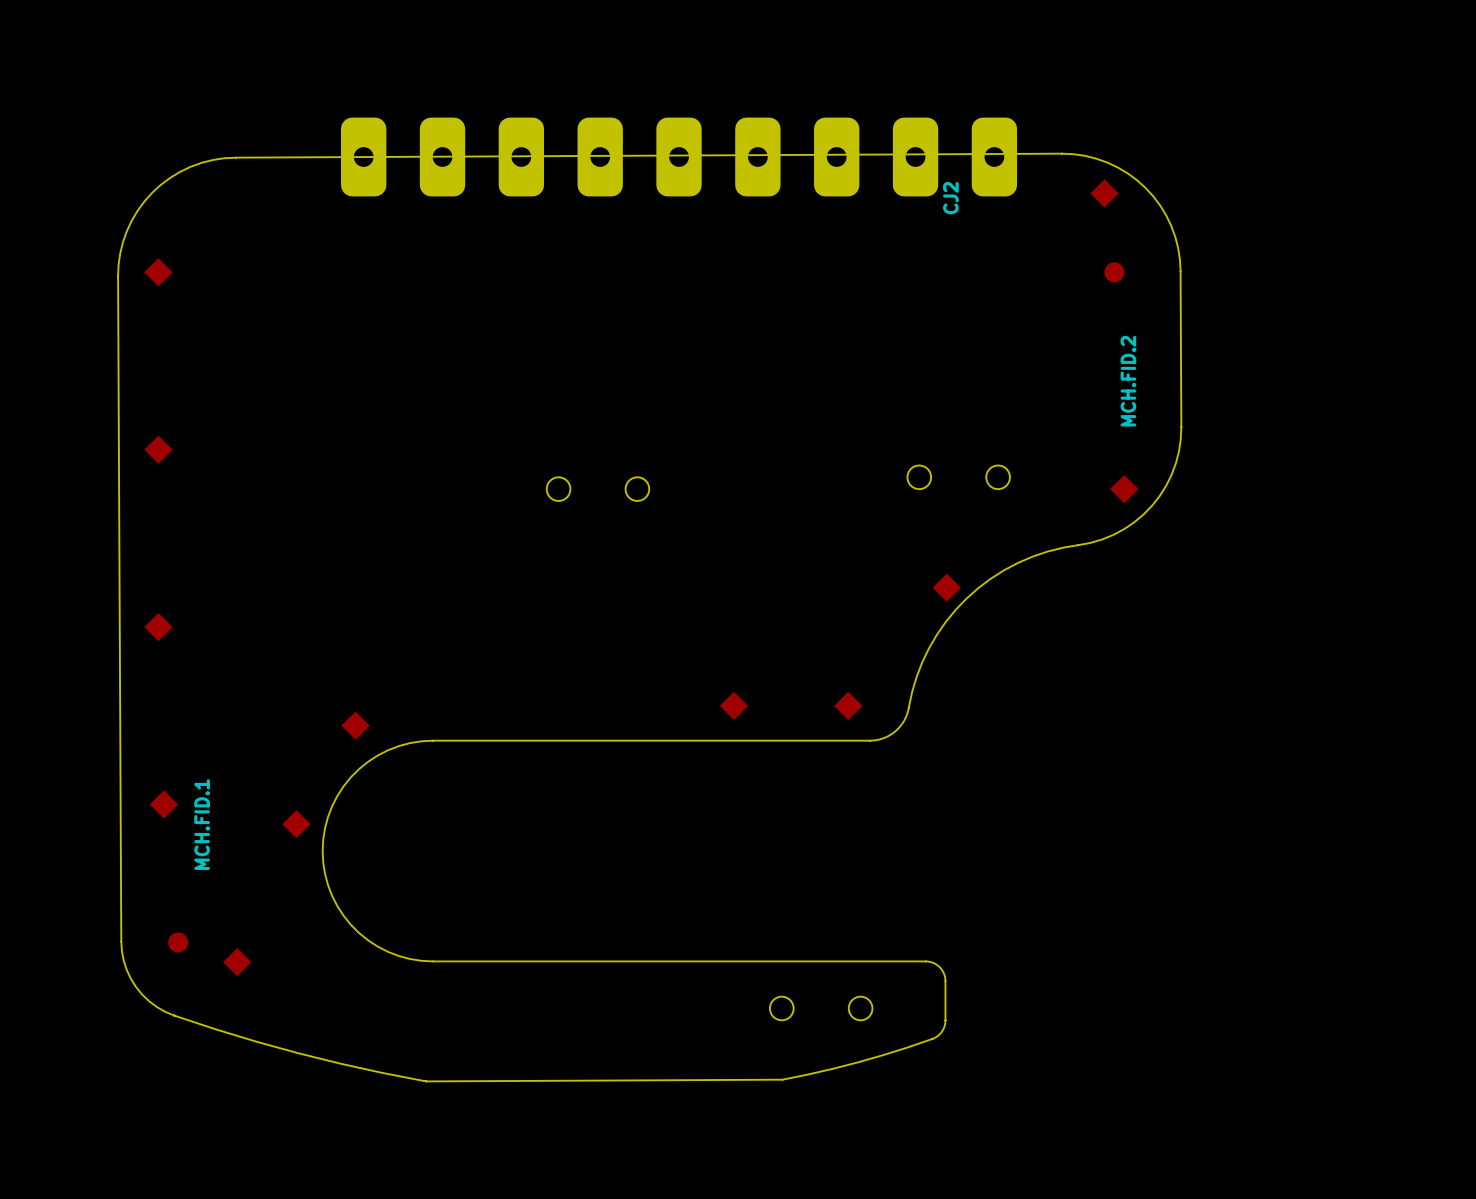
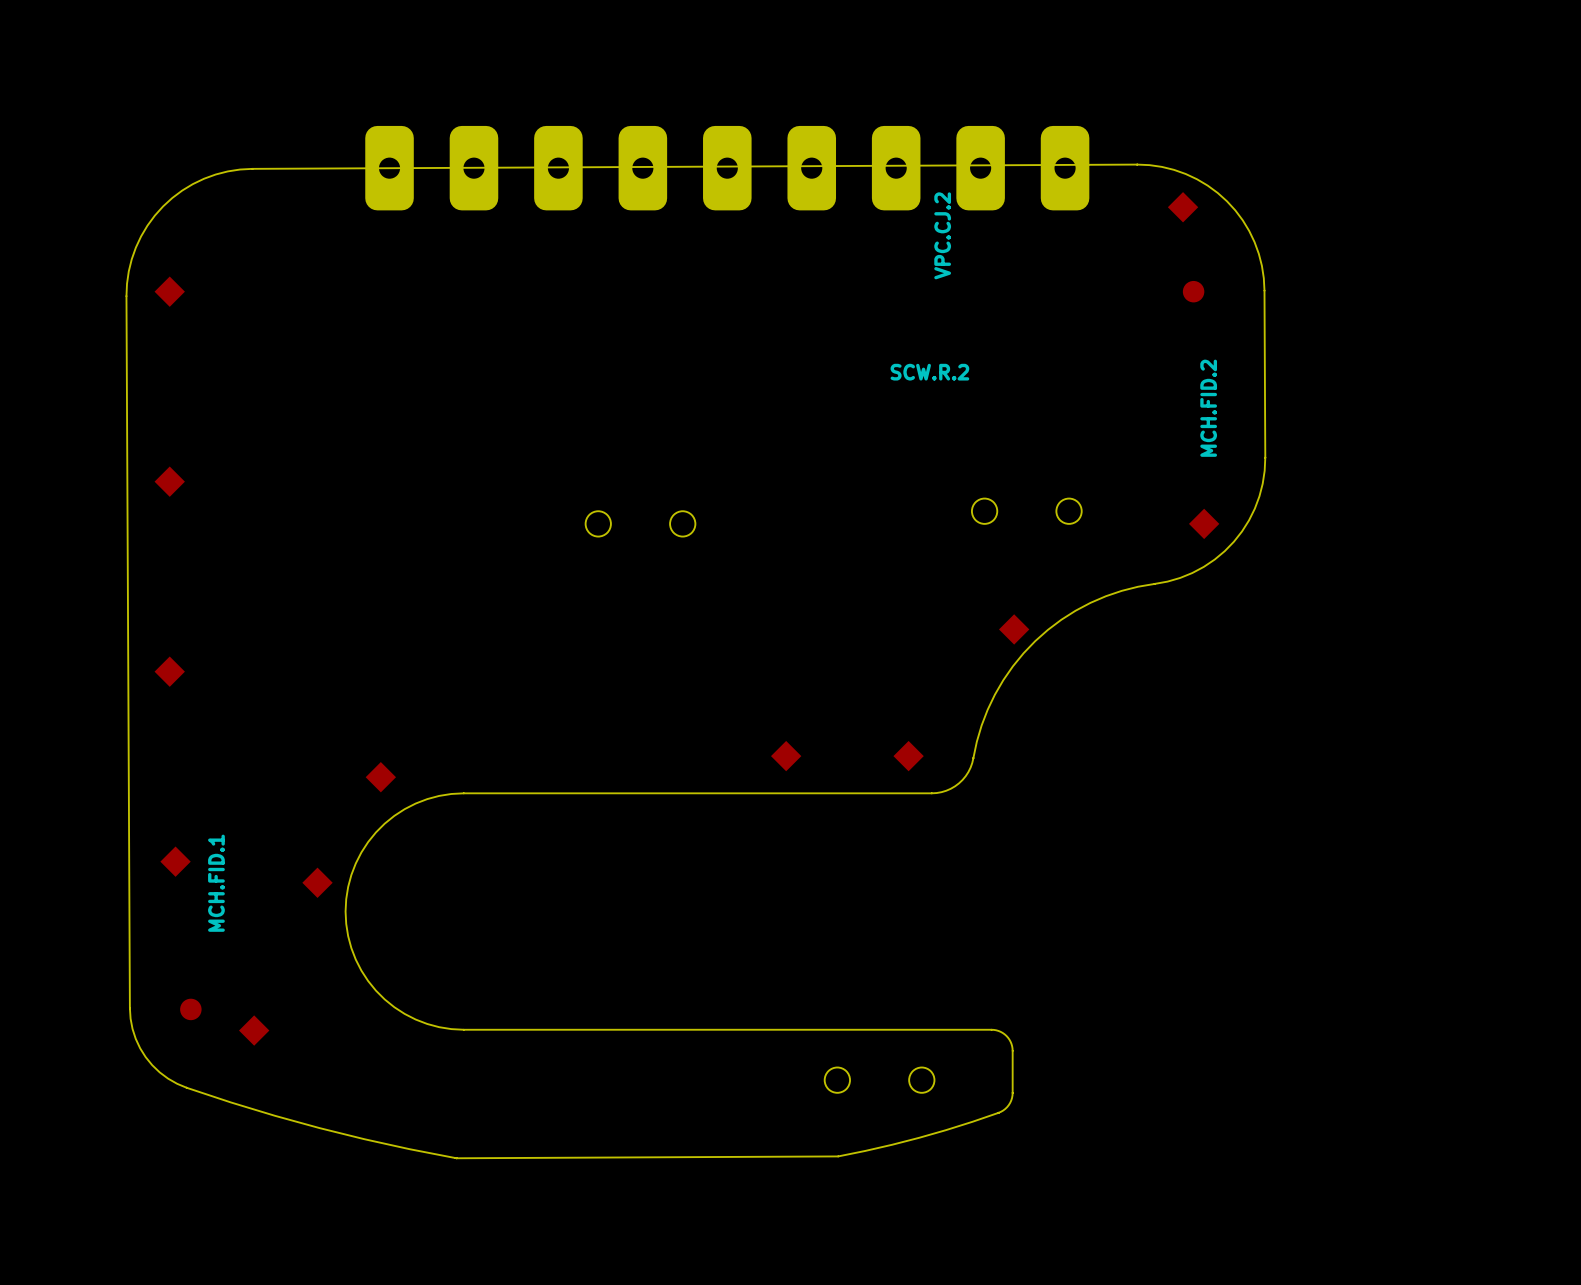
CJ2 name: CJ2 (950, 198) -> VPC.CJ.2 (942, 235)
SCW.R.2: none -> (929, 372)

